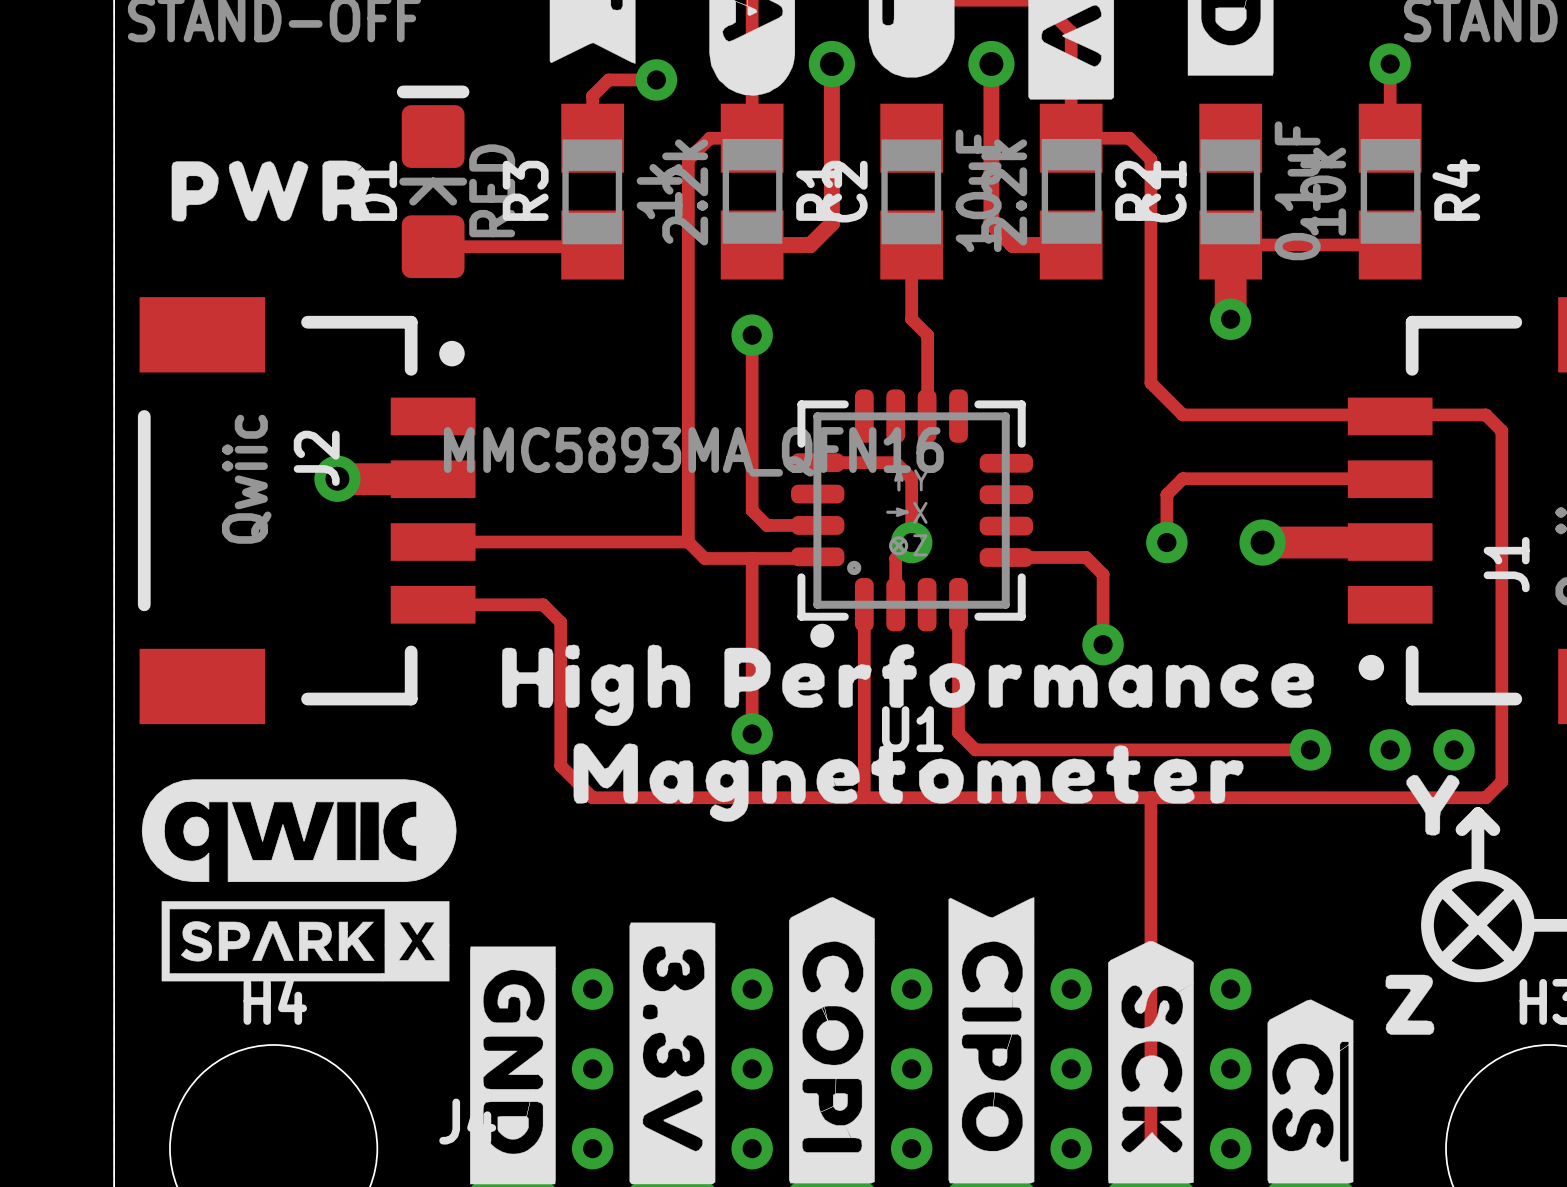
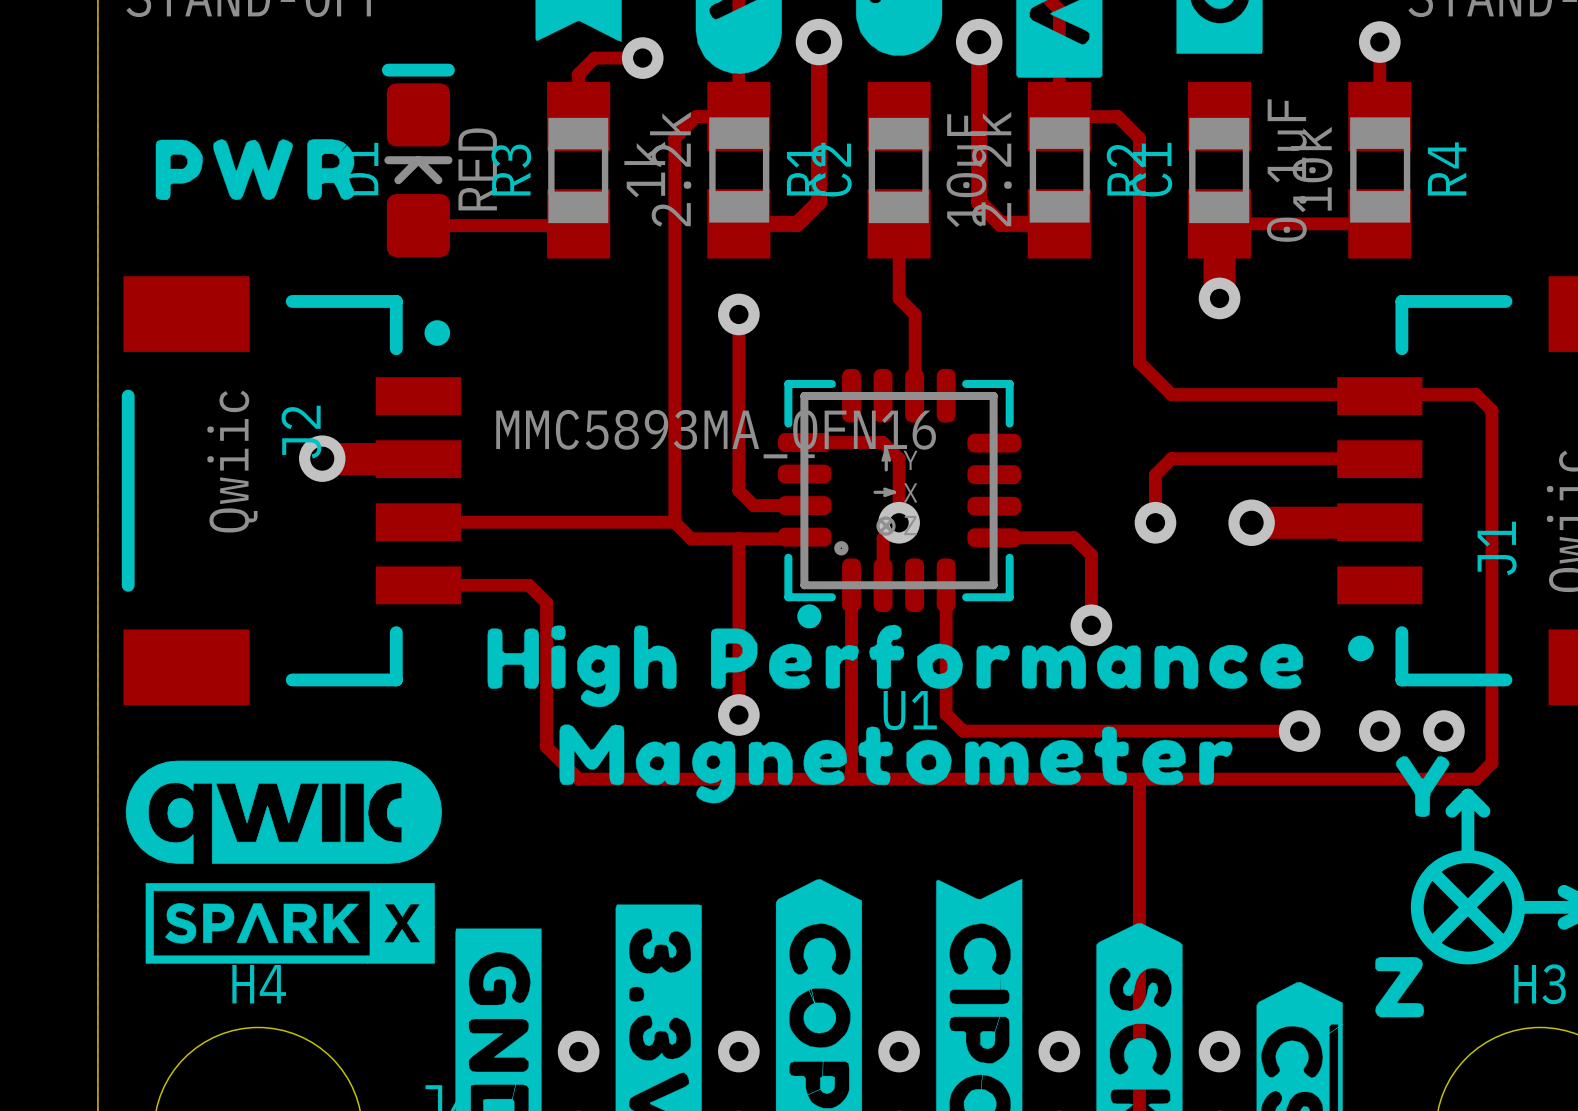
via: (592, 989) -> none
via: (752, 989) -> none
via: (911, 989) -> none
via: (1071, 989) -> none
via: (1230, 989) -> none

